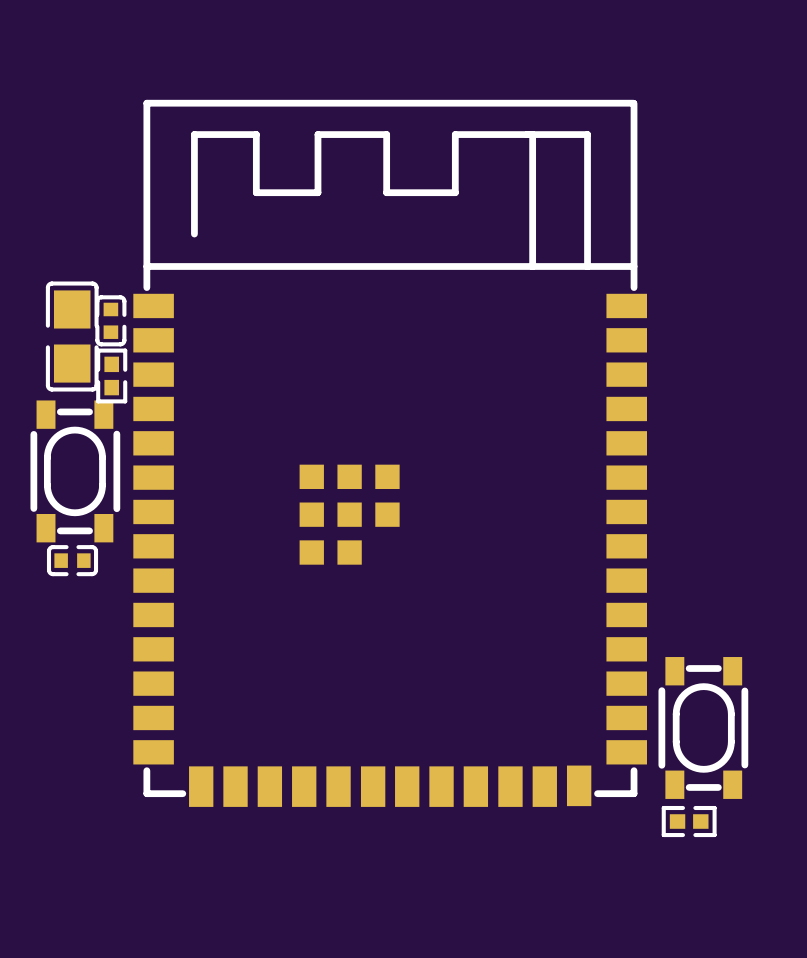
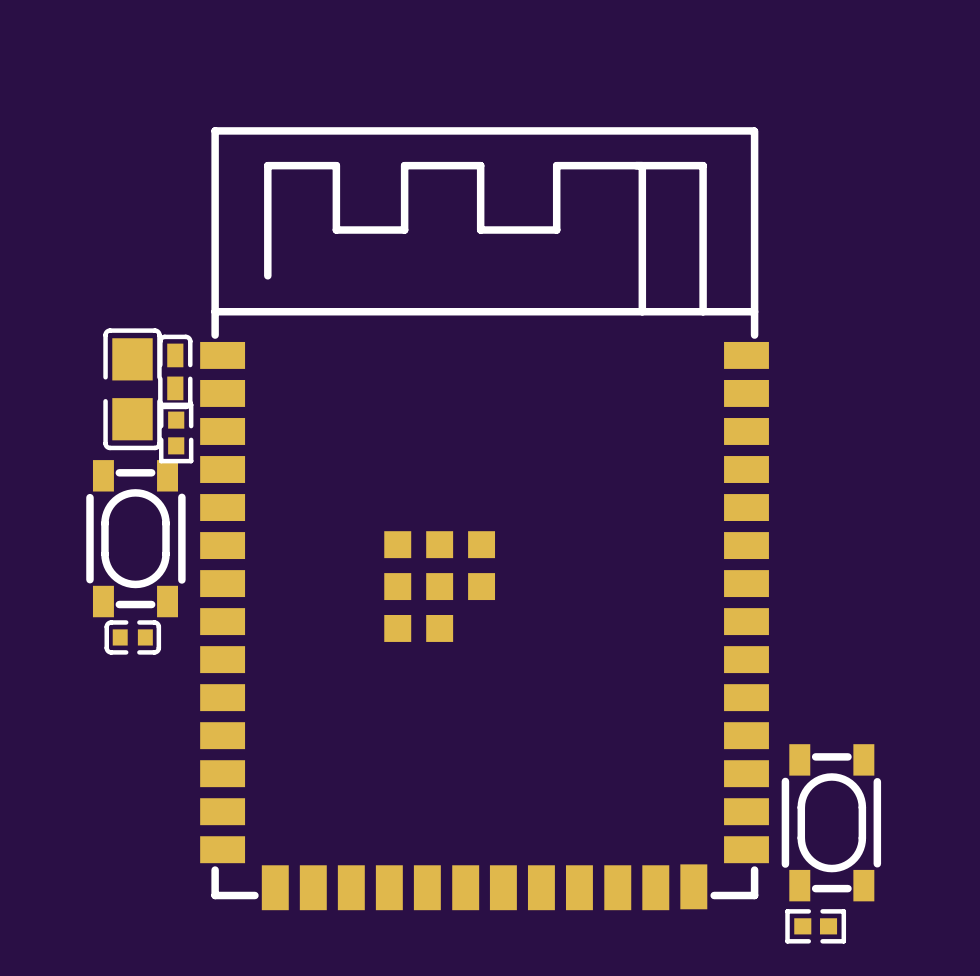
part footprint: [95, 295, 127, 347] -> [158, 334, 193, 410]

